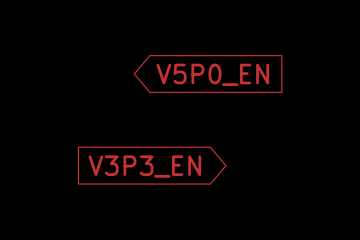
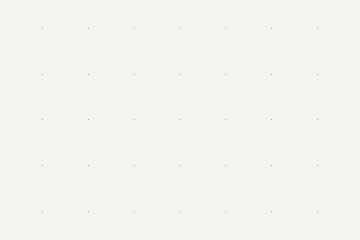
global label: V5P0_EN (212, 74) -> none
global label: V3P3_EN (144, 166) -> none

